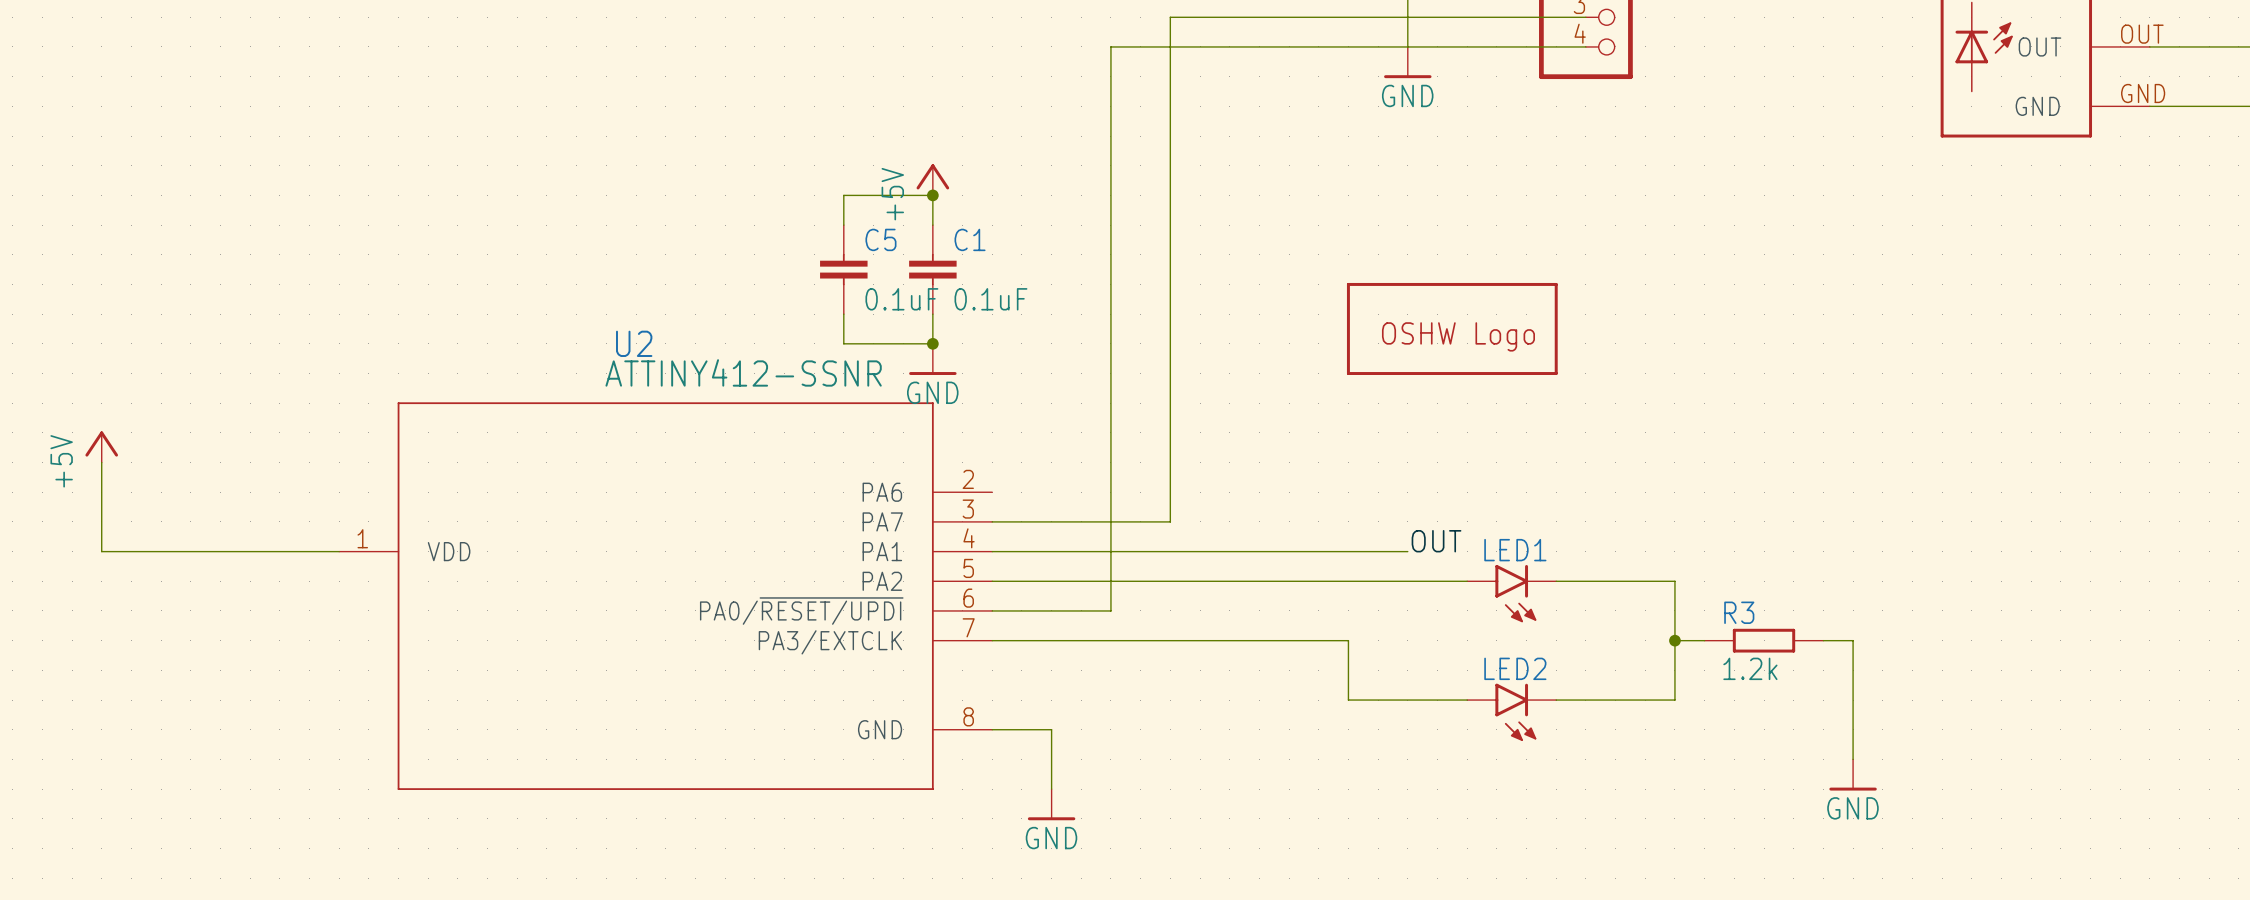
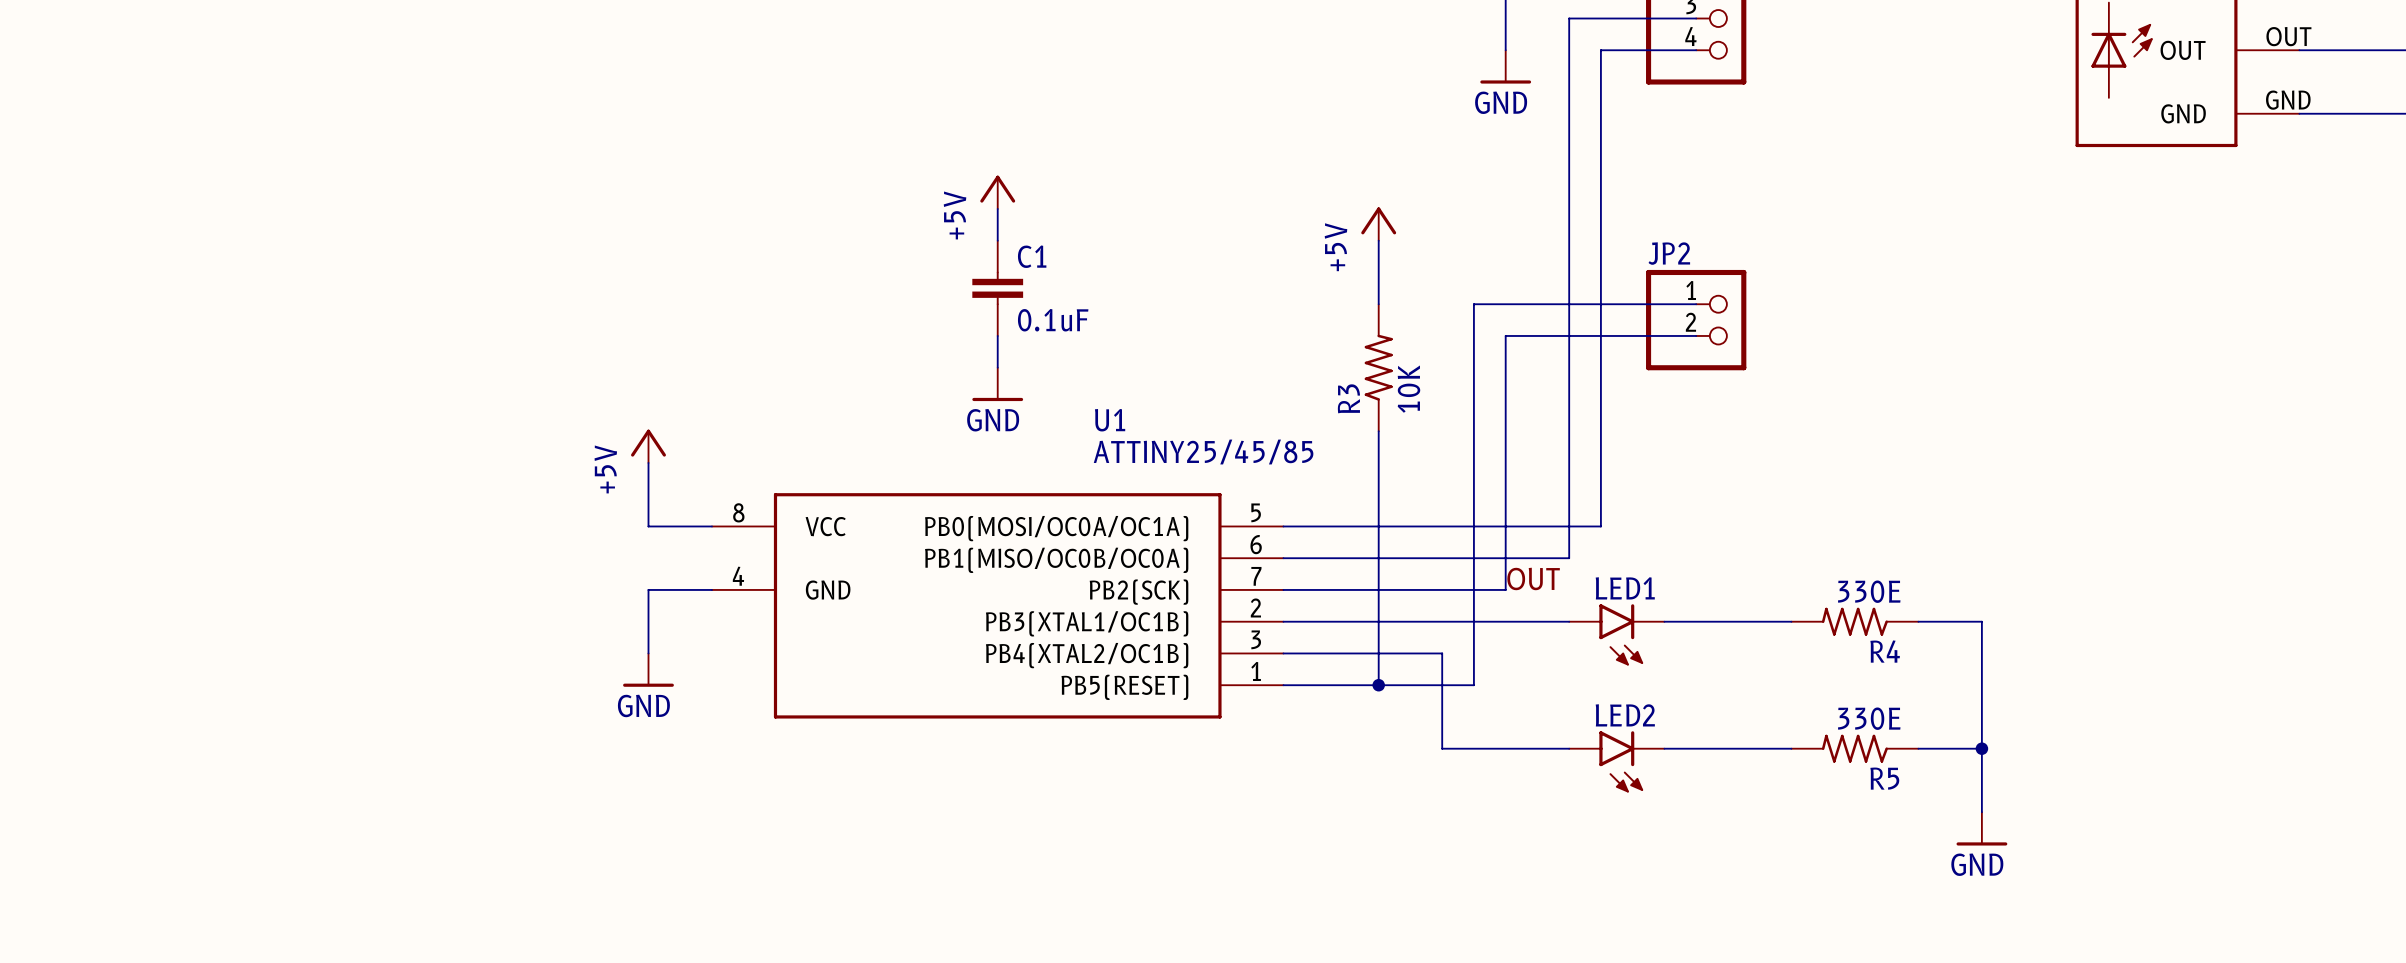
wire: (1467, 17) (1170, 17) (1170, 521) (992, 521) -> (1569, 18) (1569, 558) (1283, 558)
wire: (1496, 46) (1110, 46) (1110, 610) (992, 610) -> (1600, 50) (1600, 526) (1283, 526)
wire: (932, 195) (843, 195) (843, 225) -> none
junction: (932, 195) -> none
power symbol: none -> +5V (1378, 224)
wire: none -> (1378, 240) (1378, 304)
C5: 0.1uF (843, 269) -> none
wire: none -> (1696, 304) (1473, 304) (1473, 685) (1442, 685) (1442, 653) (1283, 653)
JP2: none -> (1696, 320)
wire: (843, 314) (843, 343) (932, 343) -> none
wire: none -> (1696, 335) (1505, 335) (1505, 589)
part: (1452, 328) -> none
junction: (932, 343) -> none
wire: none -> (1378, 431) (1378, 685)
power symbol: none -> +5V (648, 446)
wire: none -> (648, 462) (648, 526) (711, 526)
power symbol: +5V (101, 446) -> none
wire: (101, 462) (101, 551) (339, 551) -> none
wire: none -> (711, 589) (648, 589) (648, 653)
wire: (992, 551) (1200, 551) -> none
U1: none -> ATTINY25/45/85 (997, 605)
wire: (992, 581) (1200, 581) -> none
wire: (1674, 581) (1674, 700) -> none
R4: none -> 330E (1854, 621)
U2: ATTINY412-SSNR (665, 596) -> none
R3 name position: R3 (1739, 612) -> R3 (1348, 398)
power symbol: none -> GND (648, 670)
R3 symbol: [1704, 628, 1824, 653] -> [1364, 304, 1393, 432]
wire: (992, 640) (1200, 640) -> none
junction: none -> (1378, 685)
wire: (1674, 640) (1704, 640) -> none
junction: (1674, 640) -> none
wire: (1823, 640) (1853, 640) -> (1918, 621) (1981, 621) (1981, 685)
R3 value: 1.2k (1750, 668) -> 10K (1408, 389)
R5: none -> 330E (1854, 748)
wire: none -> (1918, 748) (1981, 748)
junction: none -> (1981, 748)
wire: (992, 729) (1051, 729) (1051, 789) -> none
power symbol: GND (1051, 804) -> none

